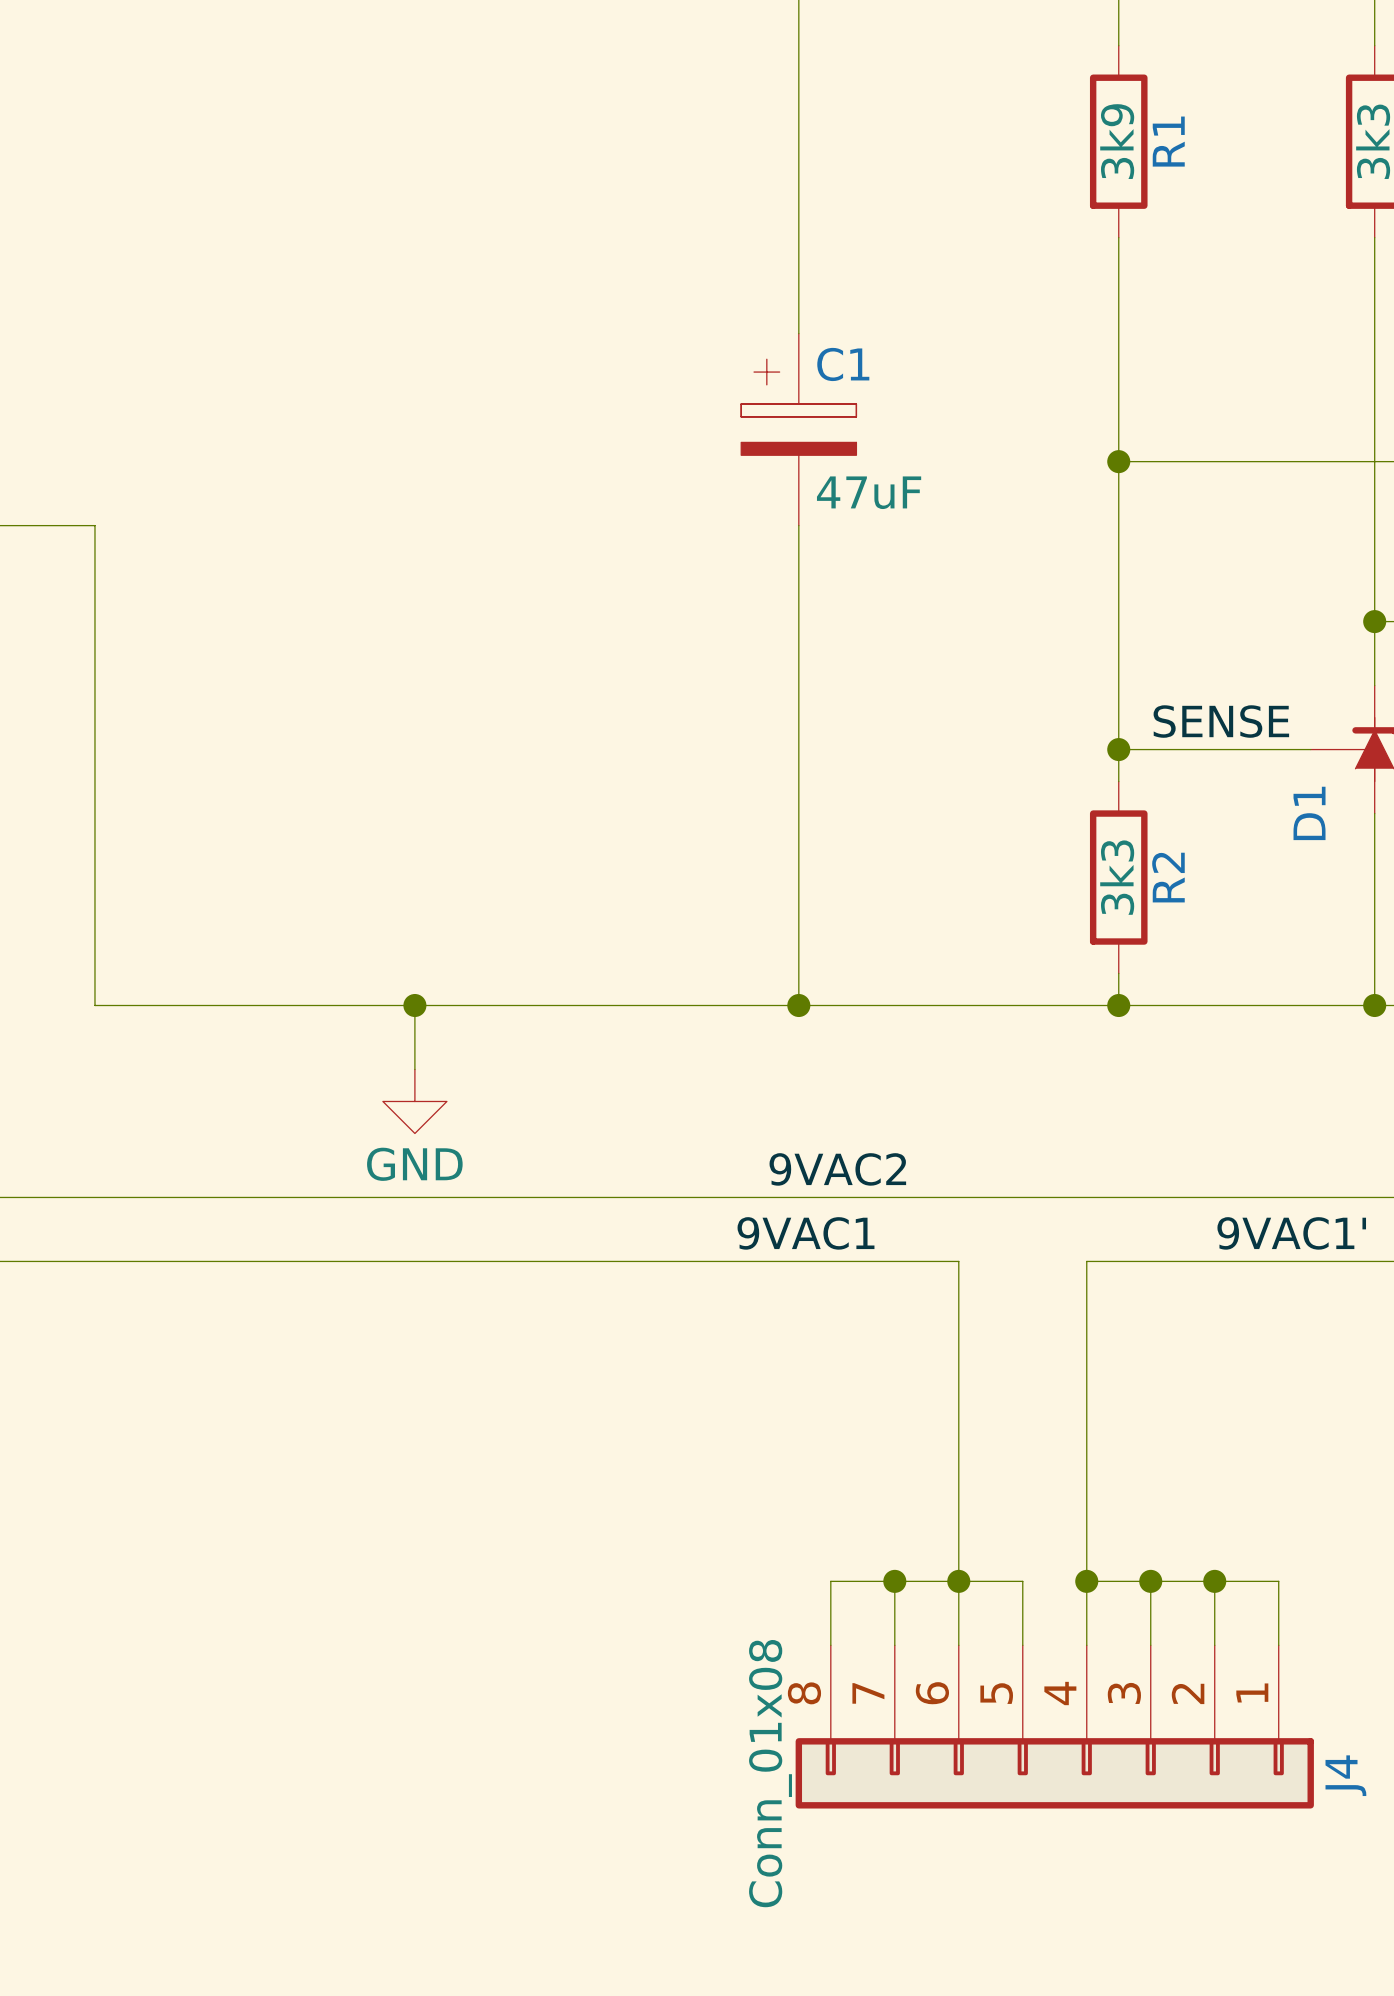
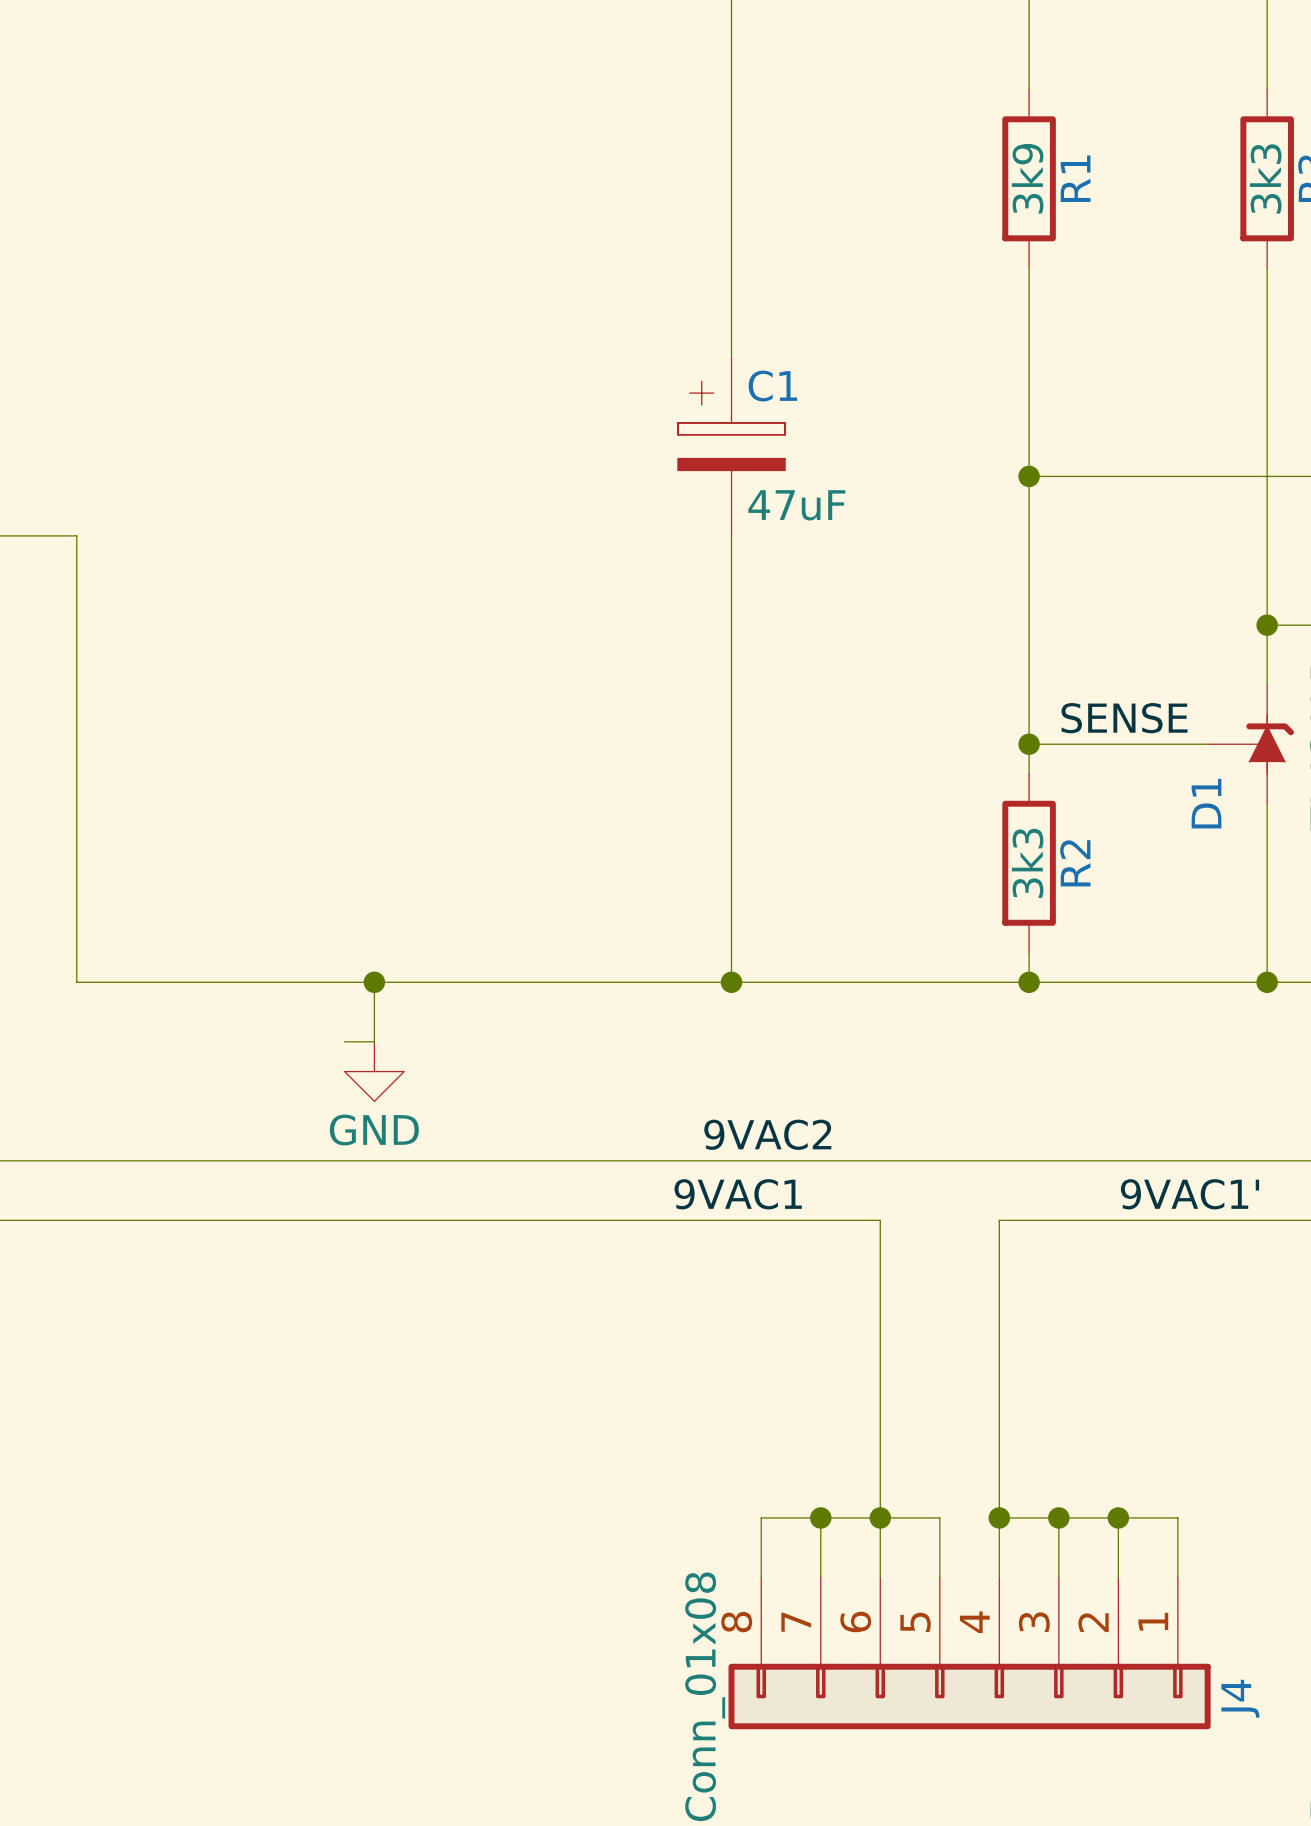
wire: none -> (344, 1041) (374, 1041)

